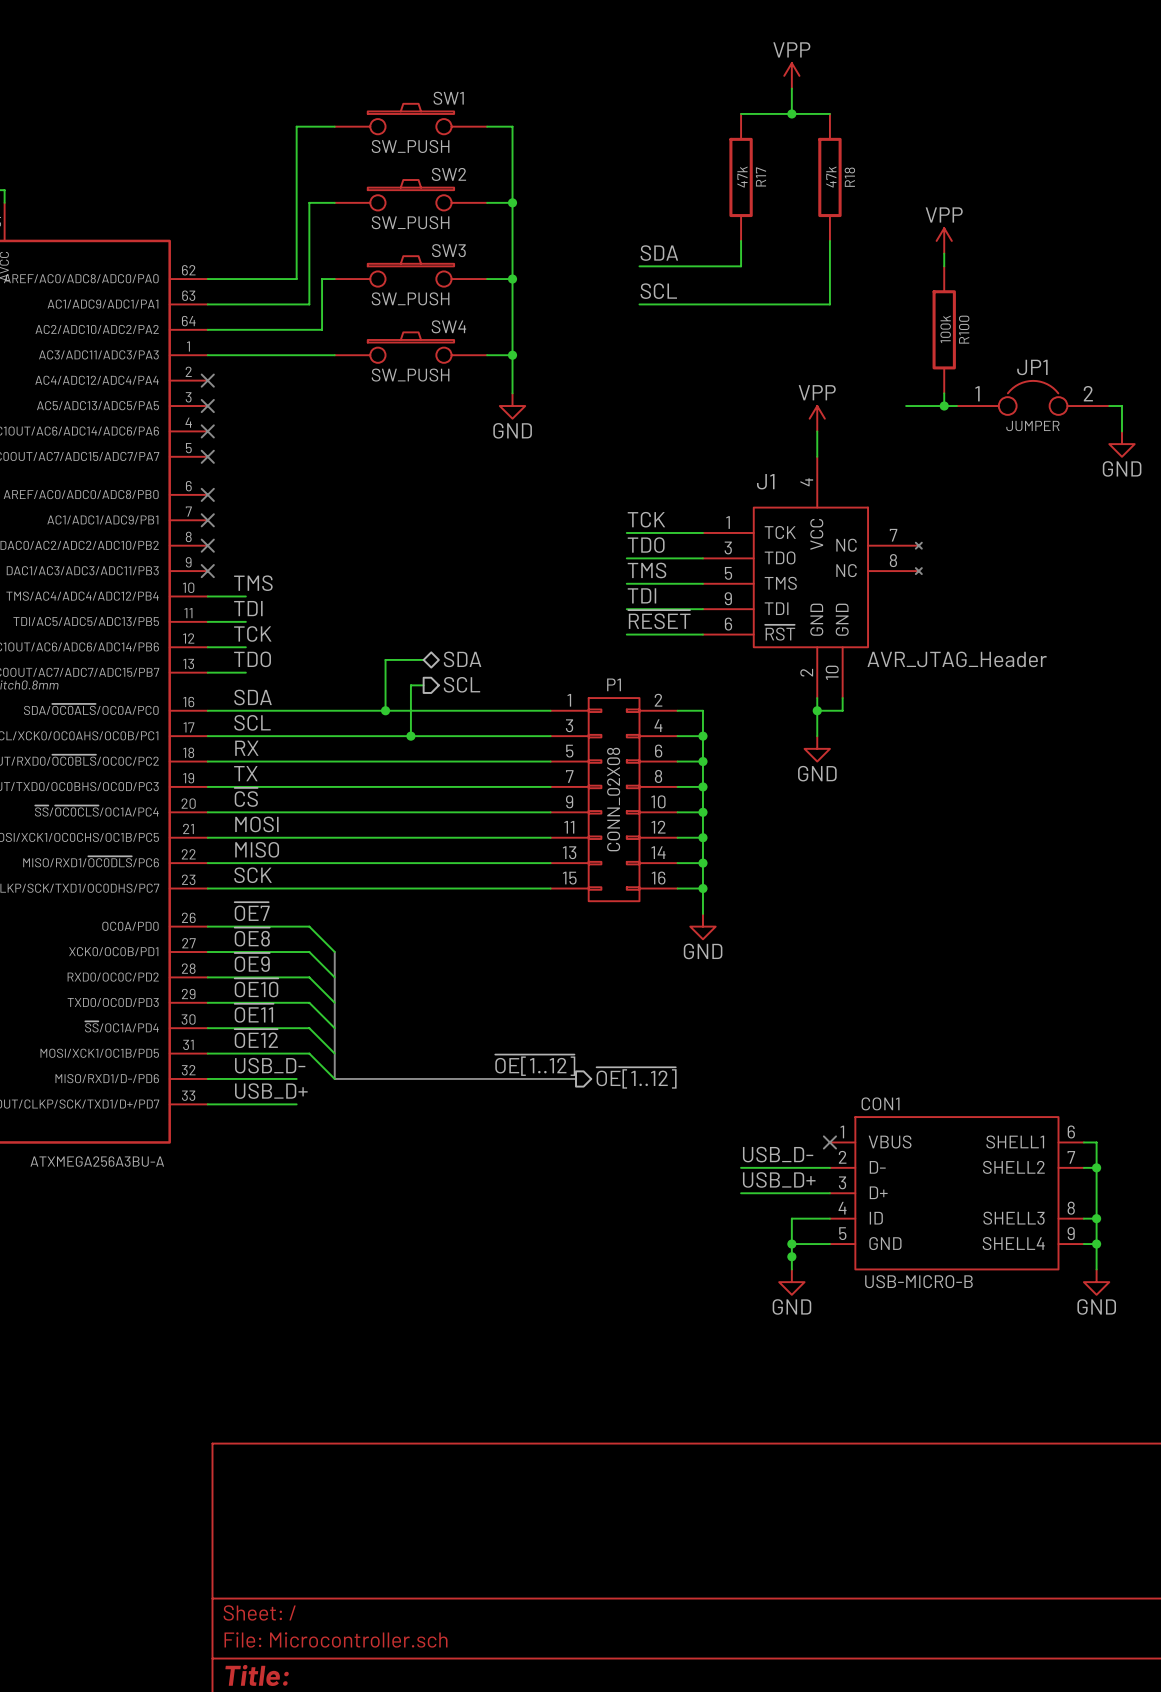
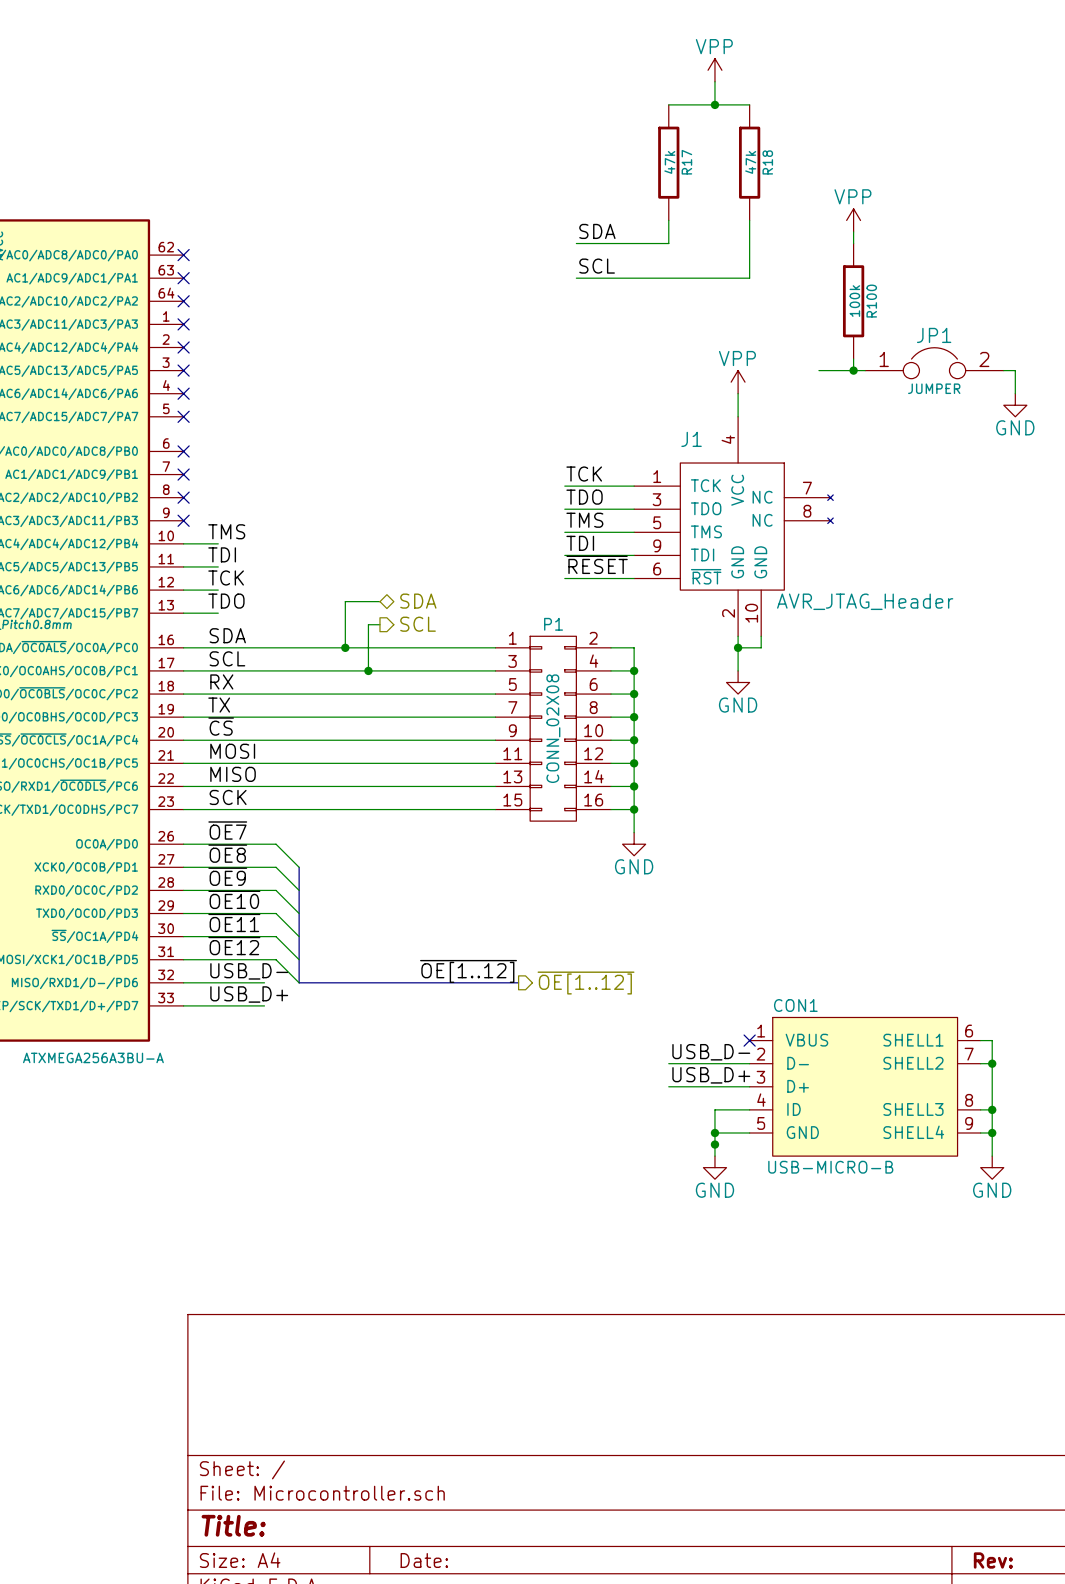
SW1: SW_PUSH (410, 119) -> none
wire: (334, 126) (296, 126) (296, 279) (207, 279) -> none
wire: (487, 126) (512, 126) (512, 393) -> none
SW2: SW_PUSH (410, 195) -> none
wire: (334, 202) (309, 202) (309, 304) (207, 304) -> none
wire: (487, 202) (512, 202) -> none
junction: (512, 202) -> none
SW3: SW_PUSH (410, 271) -> none
no-connect mark: none -> (183, 255)
wire: (334, 279) (322, 279) (322, 329) (207, 329) -> none
wire: (487, 279) (512, 279) -> none
junction: (512, 279) -> none
no-connect mark: none -> (183, 278)
no-connect mark: none -> (183, 301)
SW4: SW_PUSH (410, 347) -> none
wire: (207, 355) (334, 355) -> none
no-connect mark: none -> (183, 324)
wire: (487, 355) (512, 355) -> none
junction: (512, 355) -> none
power symbol: GND (512, 406) -> none

